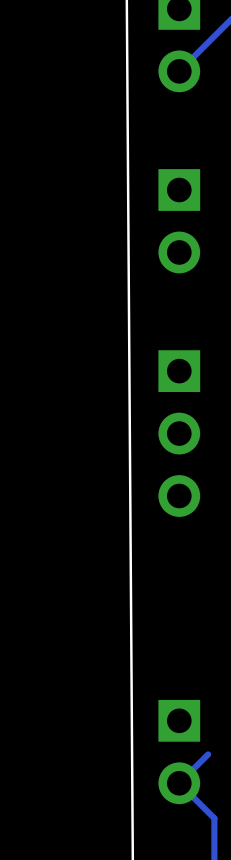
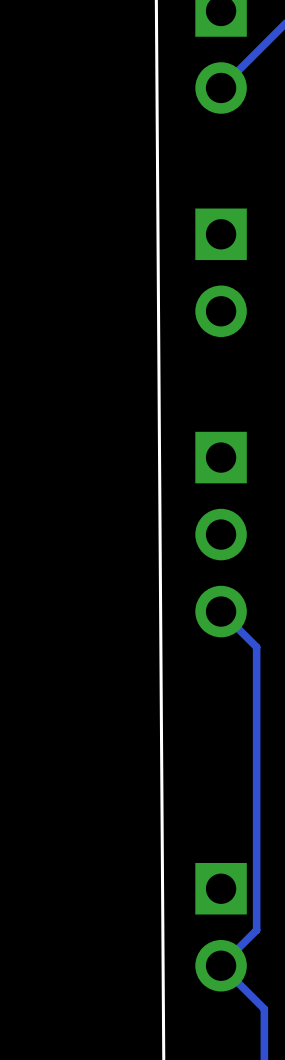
track: none -> (221, 611) (256, 647) (256, 930)

